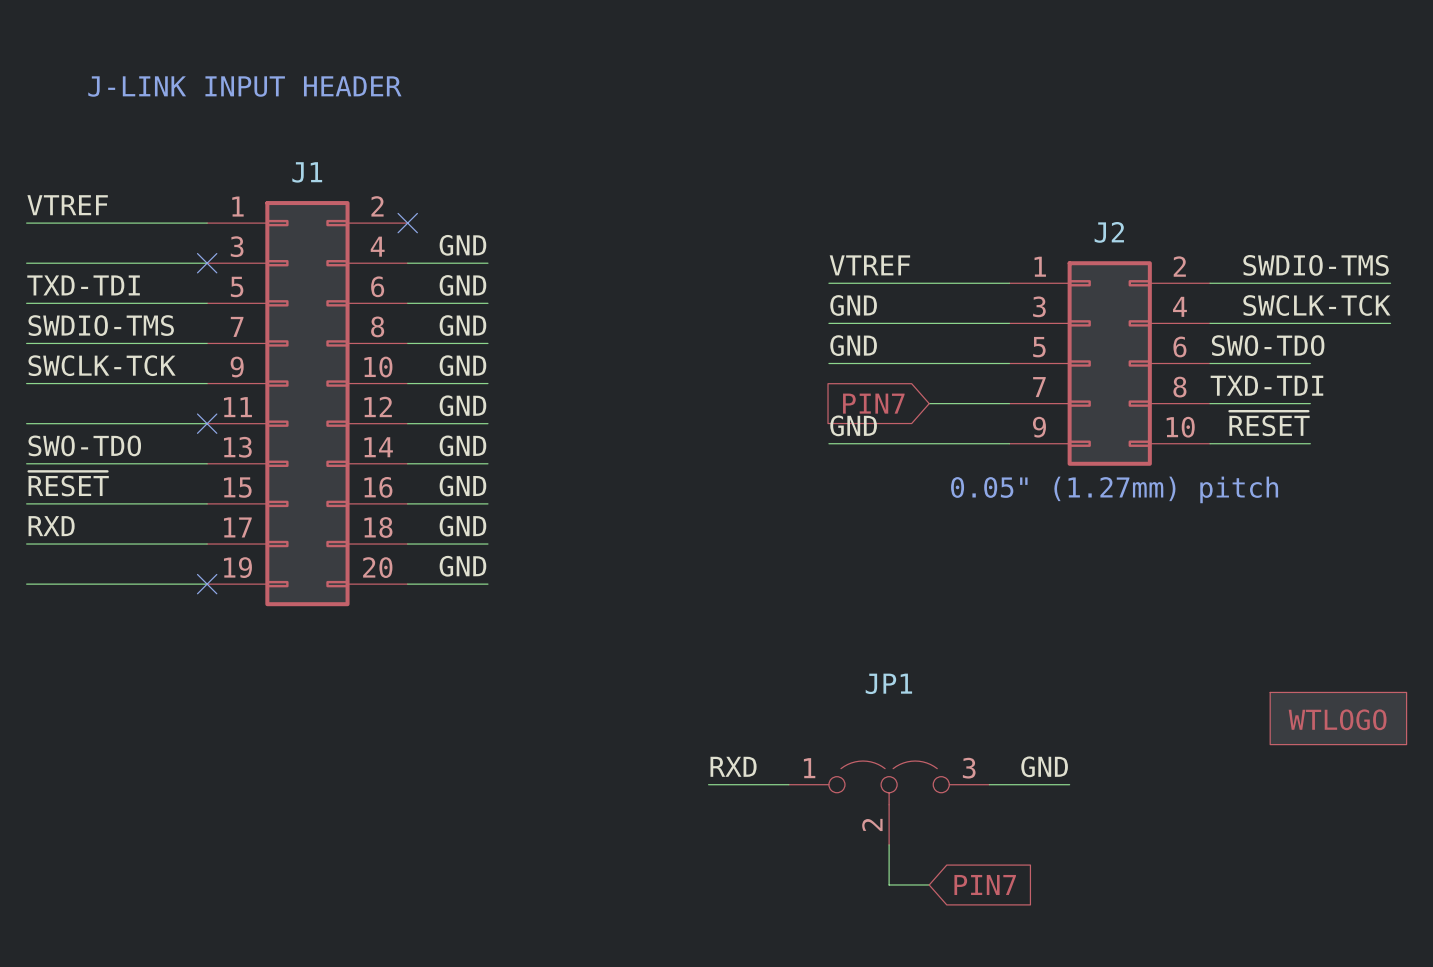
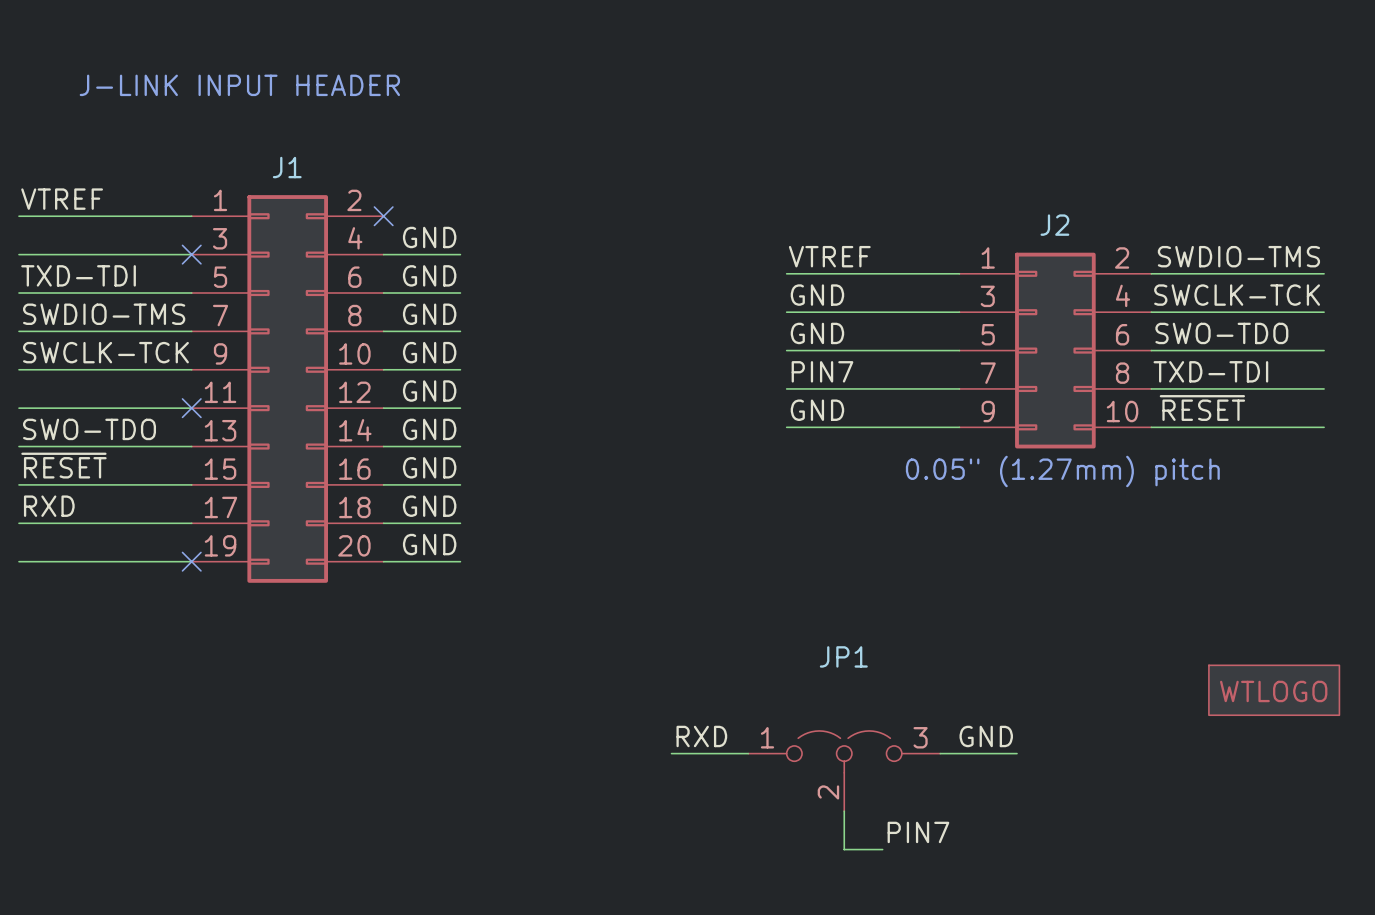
wire: none -> (1247, 350) (1324, 350)
label: none -> PIN7 (822, 371)
wire: none -> (786, 388) (882, 388)
global label: PIN7 (873, 403) -> none
wire: none -> (1247, 388) (1324, 388)
wire: none -> (1247, 427) (1324, 427)
label: none -> PIN7 (918, 832)
global label: PIN7 (985, 884) -> none

